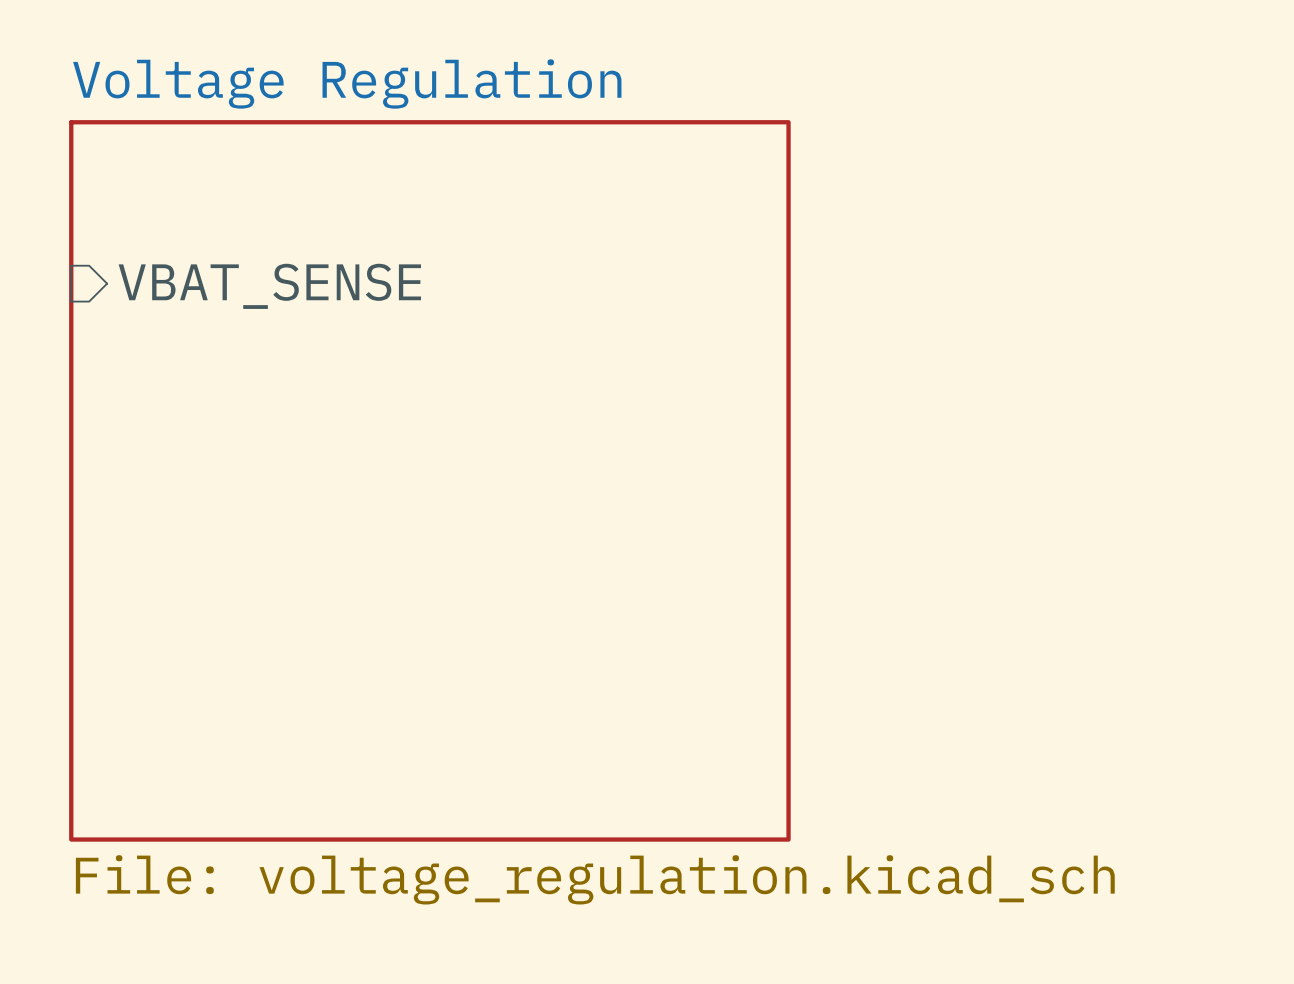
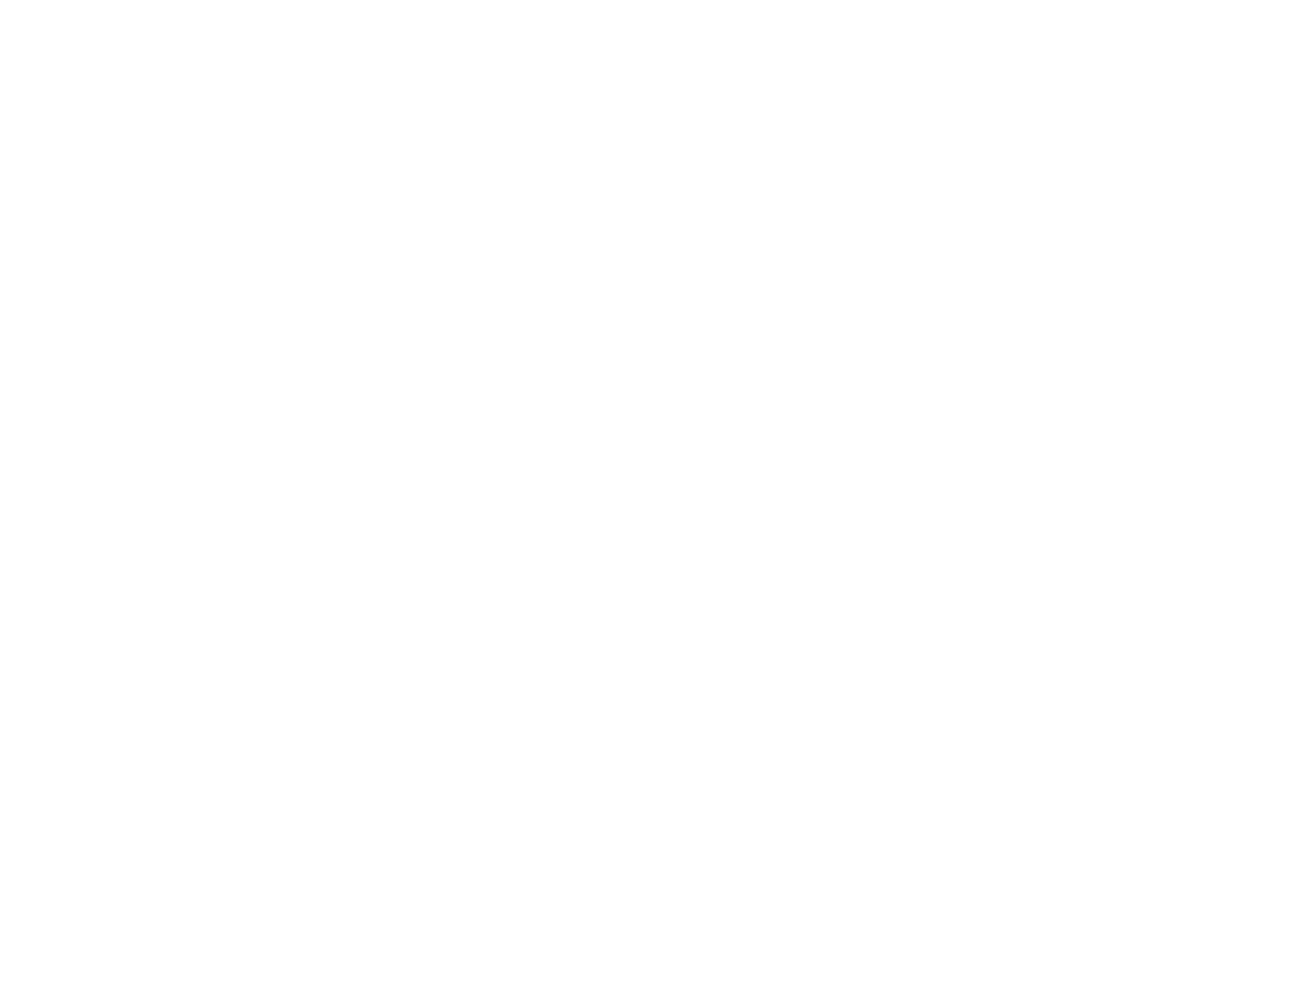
sheet pin: VBAT_SENSE (269, 286) -> none
sheet Voltage Regulation: File: voltage_regulation.kicad_sch (429, 480) -> none

